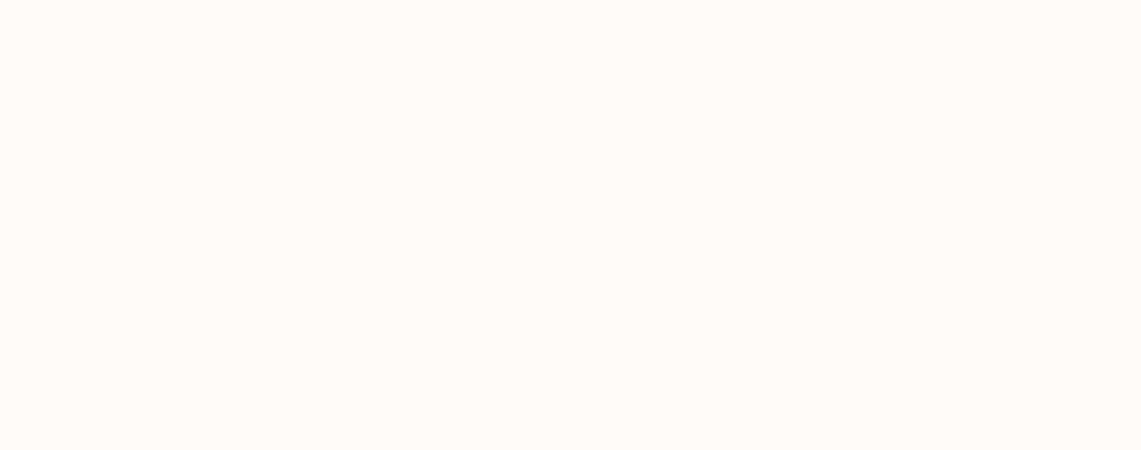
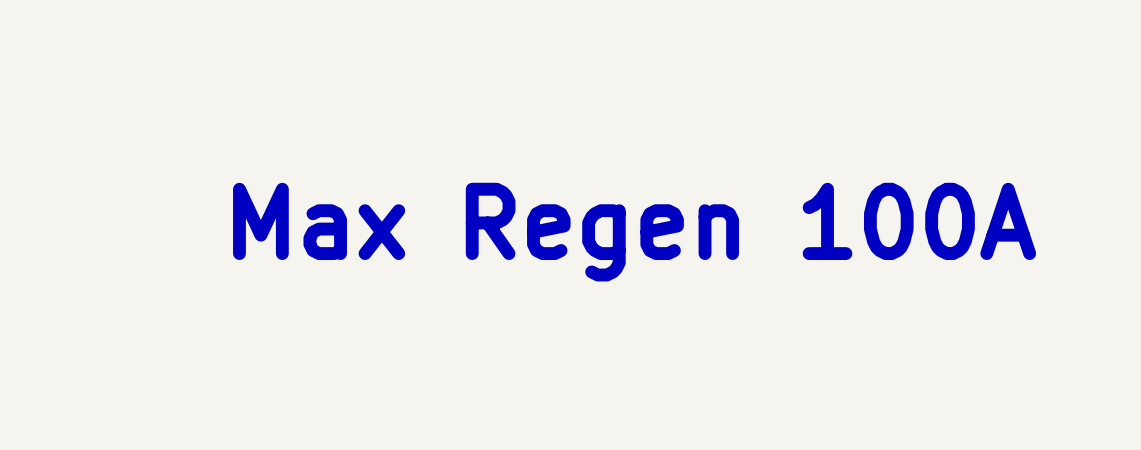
text: none -> Max Regen 100A (634, 232)

